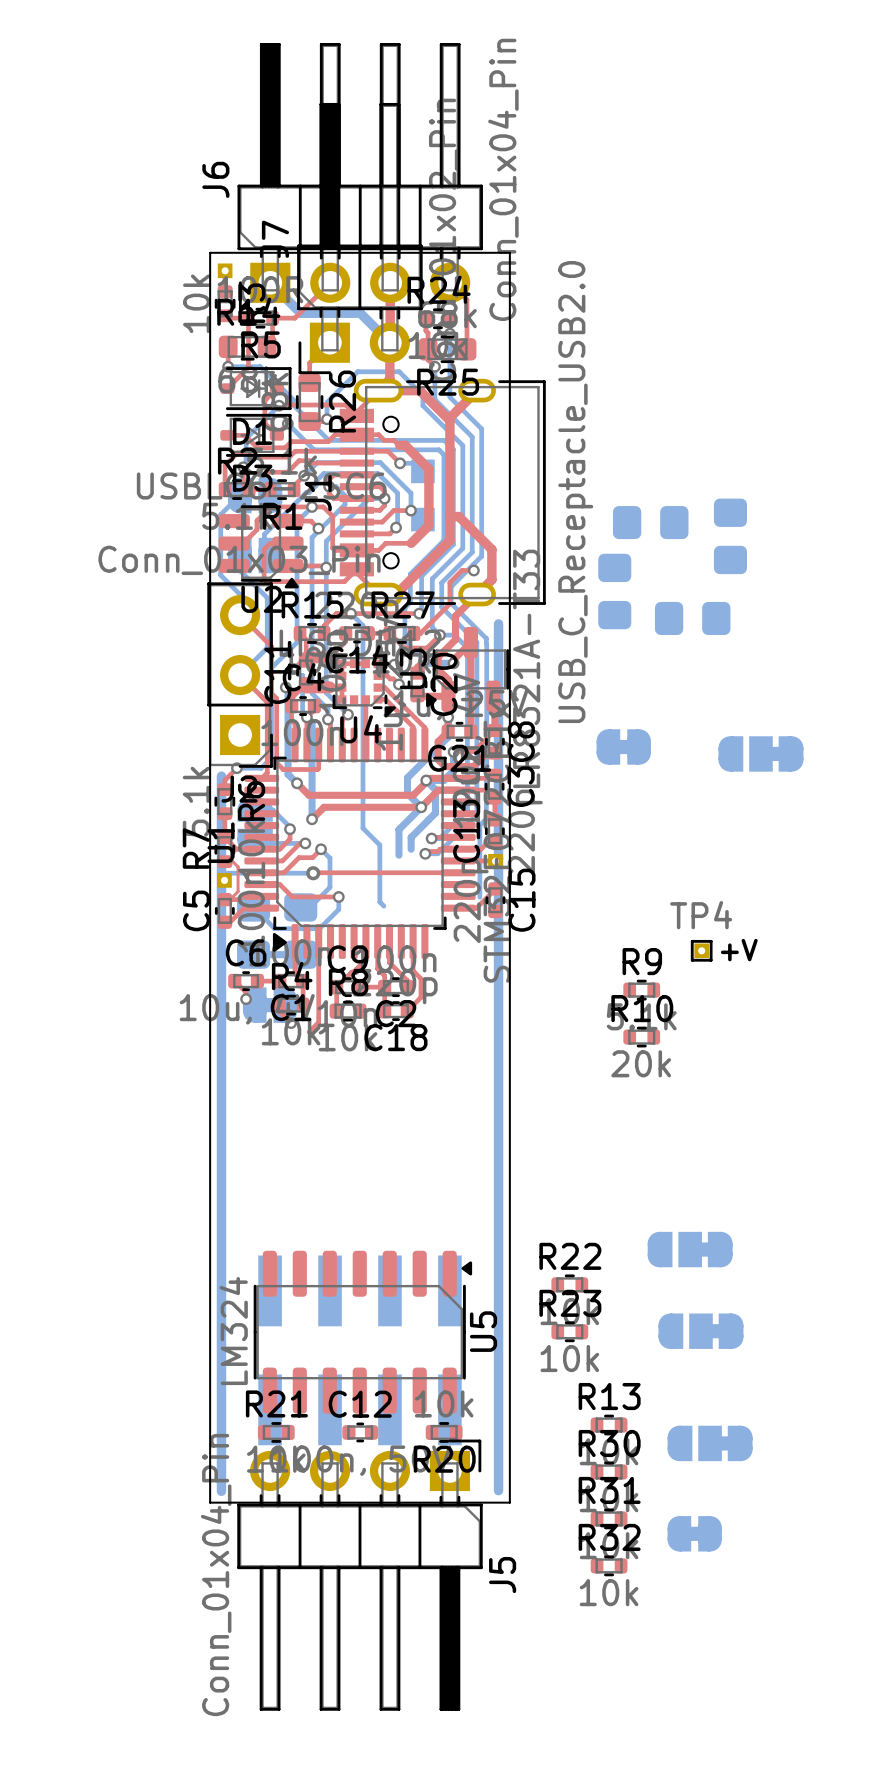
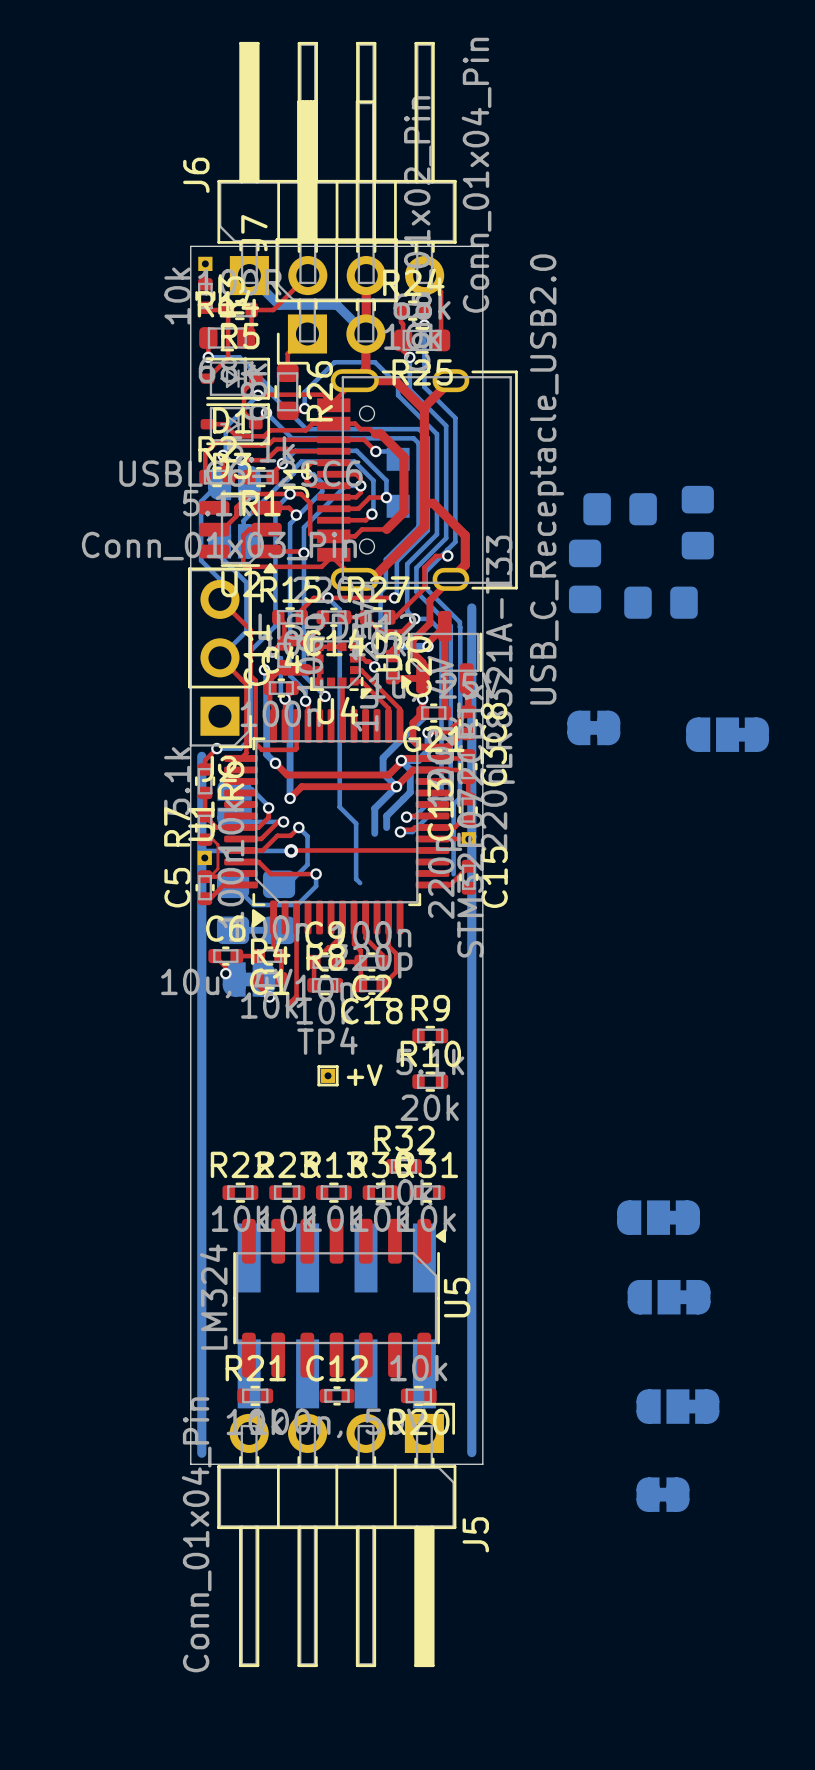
TP4 position: (701, 950) -> (328, 1075)
R9 position: (641, 990) -> (430, 1035)
R10 position: (641, 1037) -> (430, 1081)
R22 position: (569, 1284) -> (240, 1192)
R23 position: (569, 1331) -> (287, 1192)
R13 position: (609, 1425) -> (333, 1192)
R30 position: (609, 1471) -> (380, 1192)
R31 position: (609, 1518) -> (427, 1192)
R32 position: (609, 1565) -> (403, 1166)

